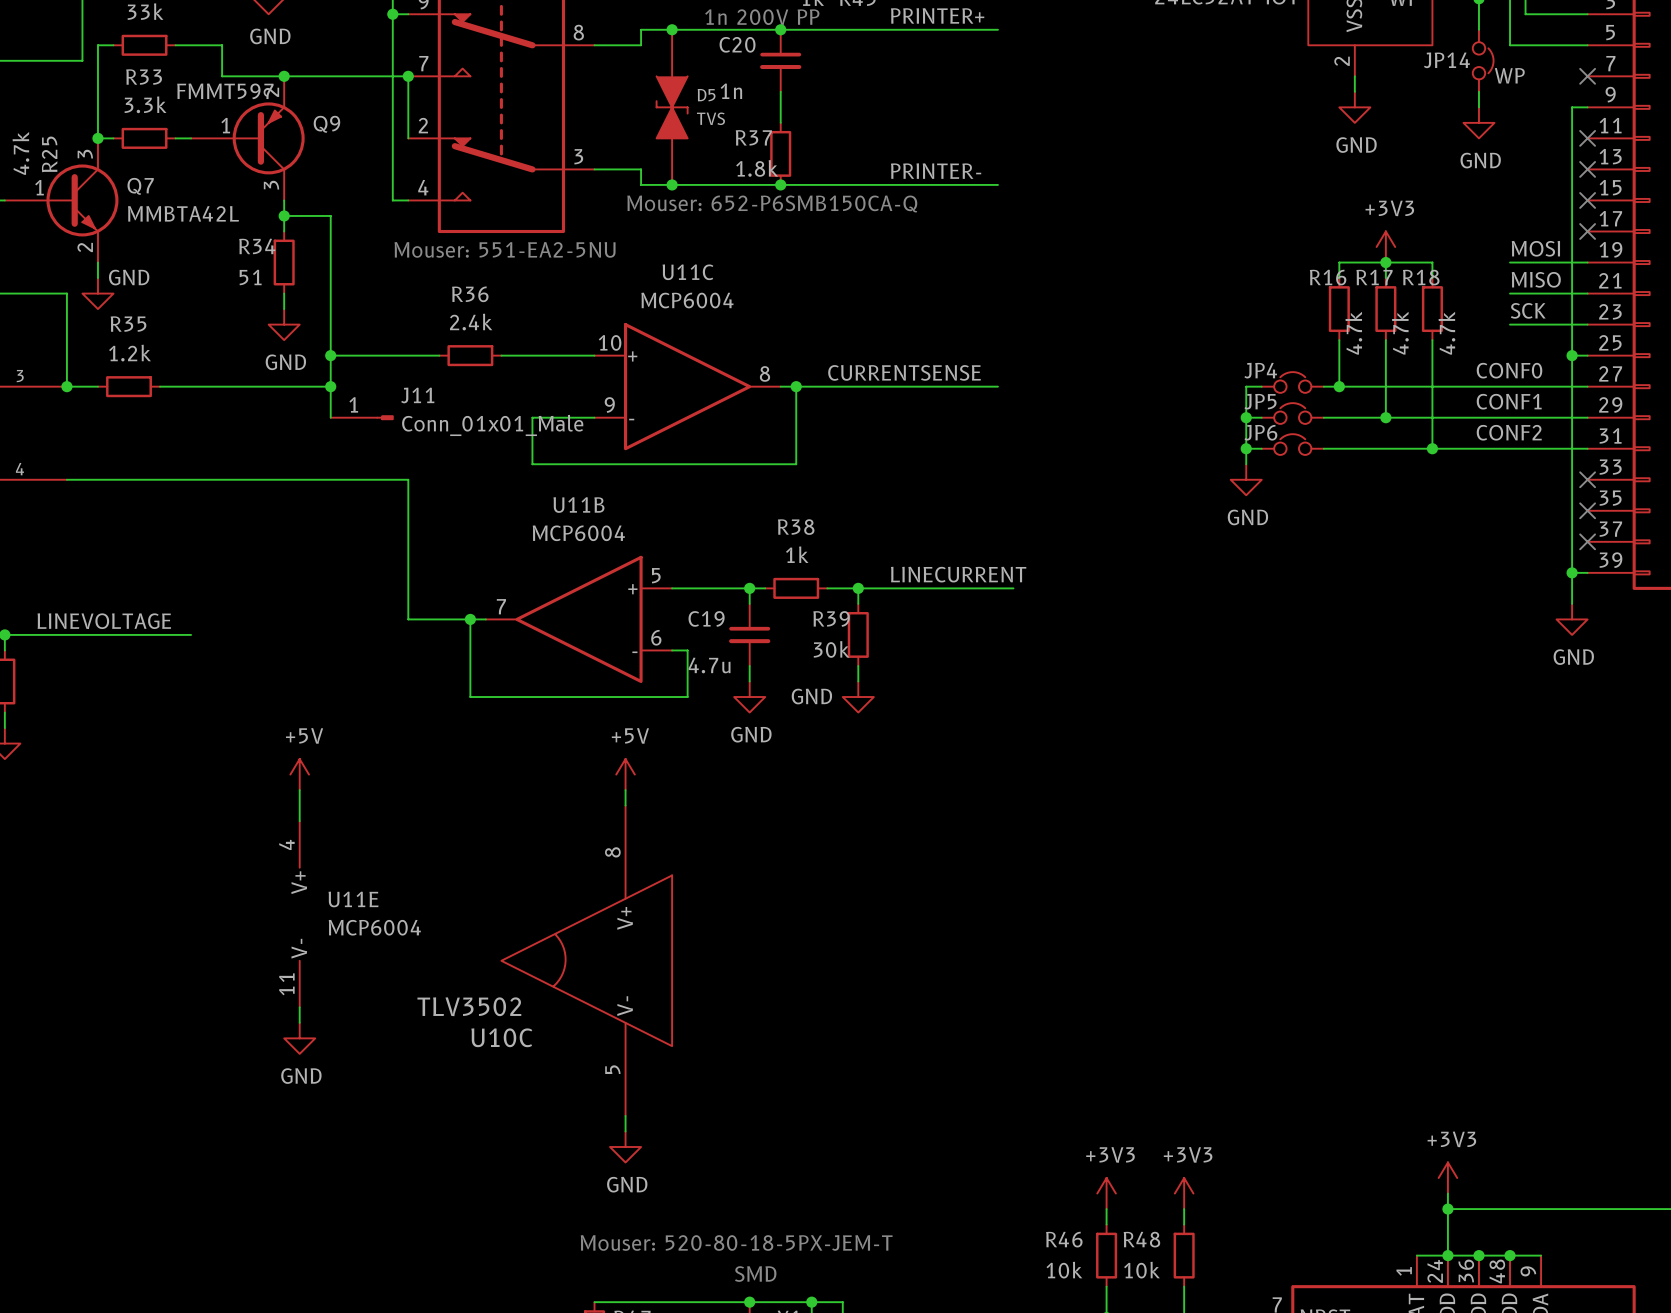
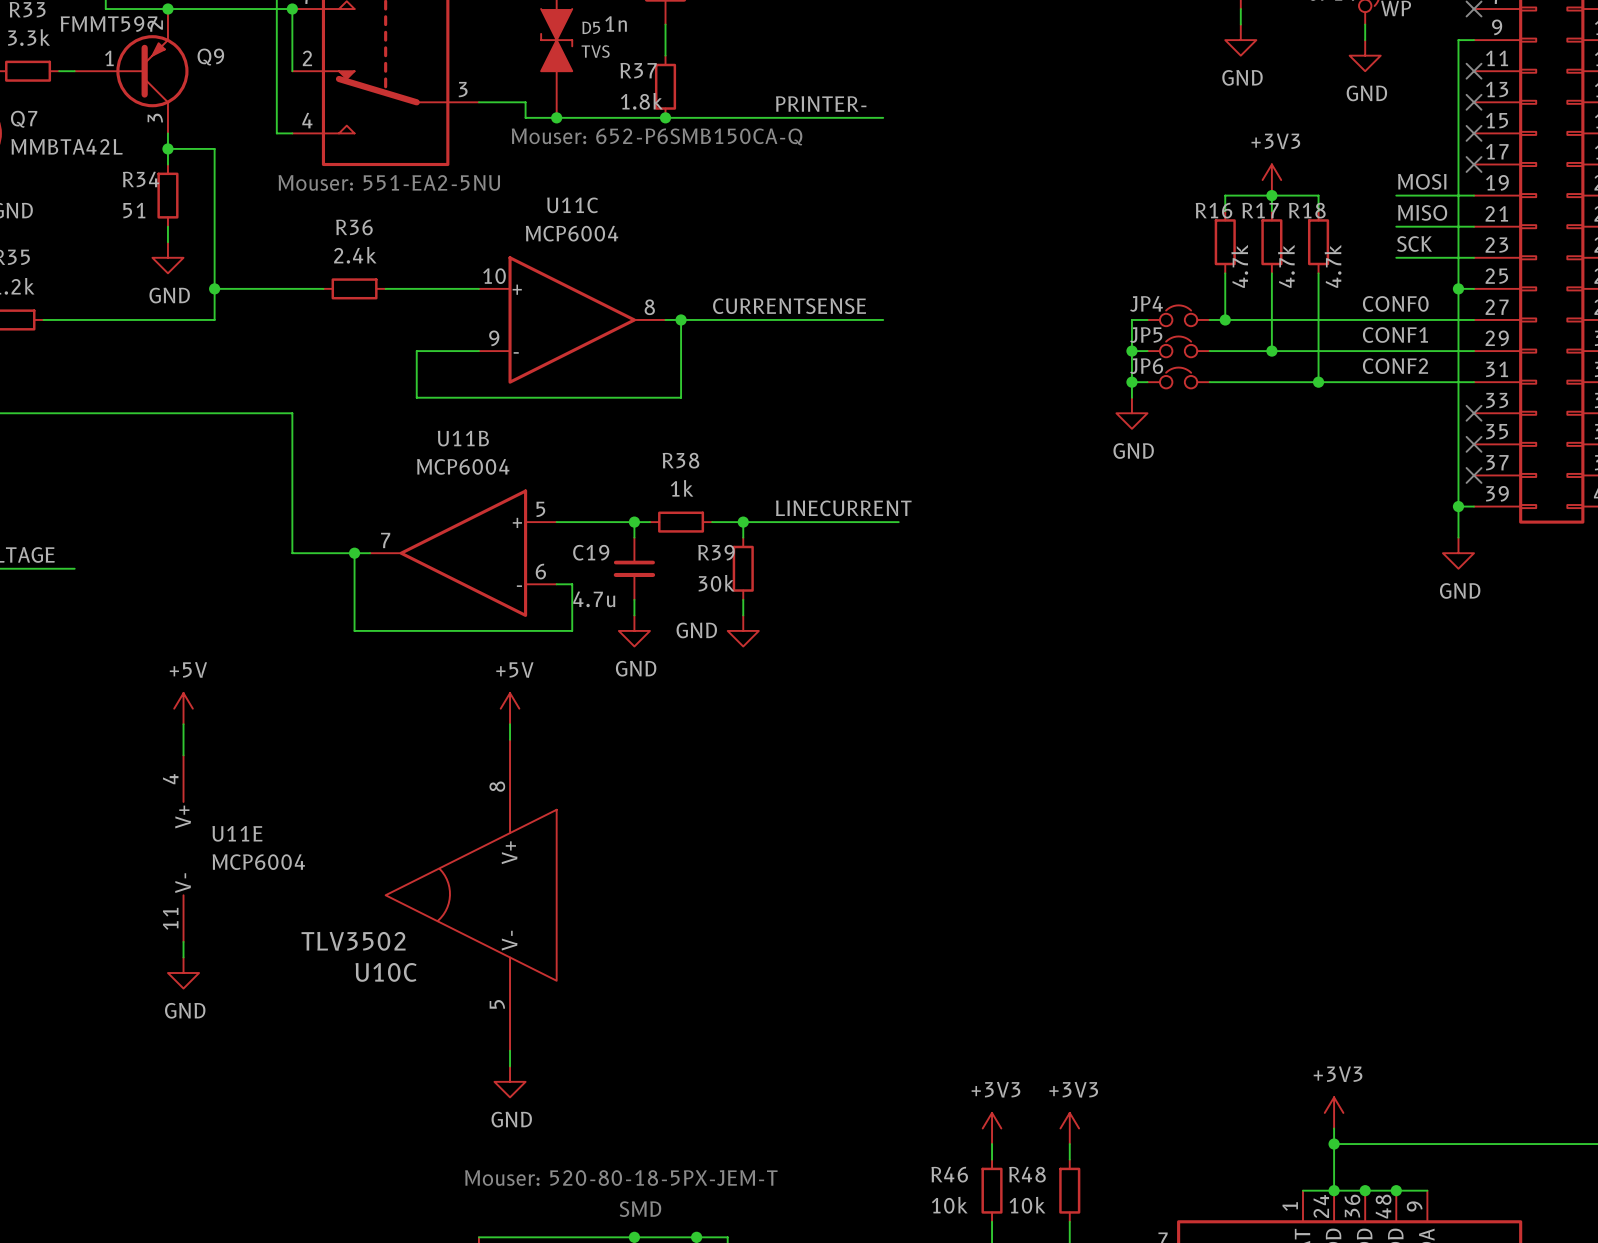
wire: (330, 386) (330, 417) -> none
junction: (330, 386) -> none
J11: Conn_01x01_Male (362, 417) -> none

